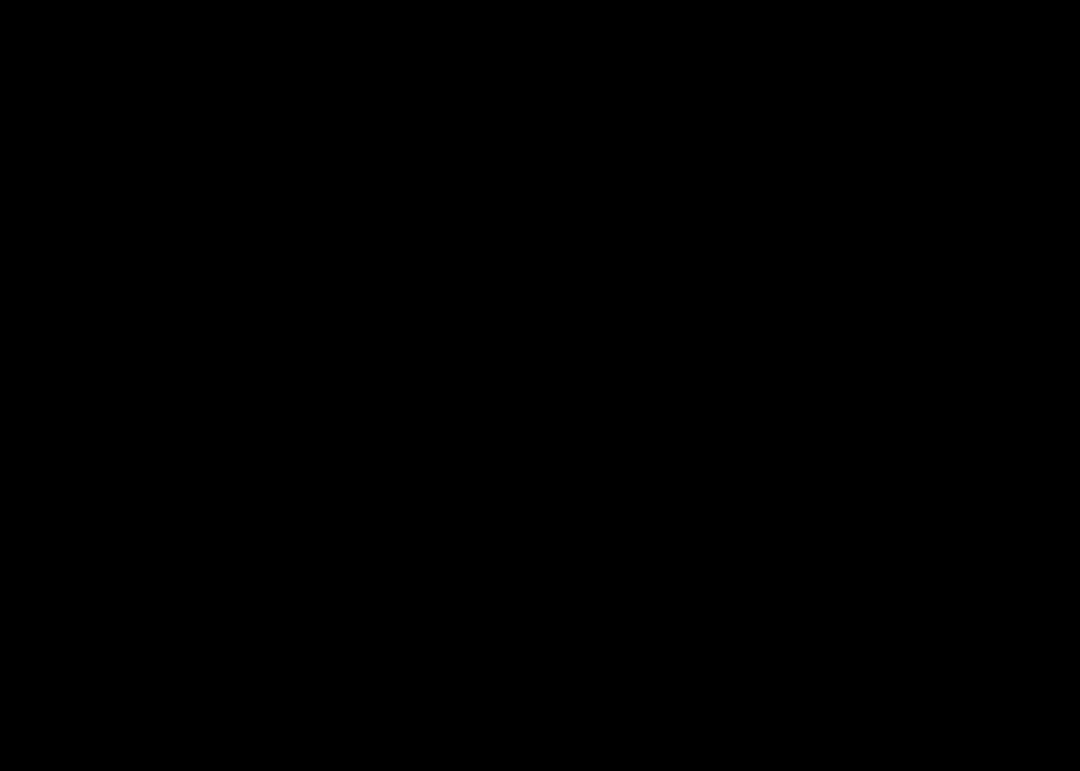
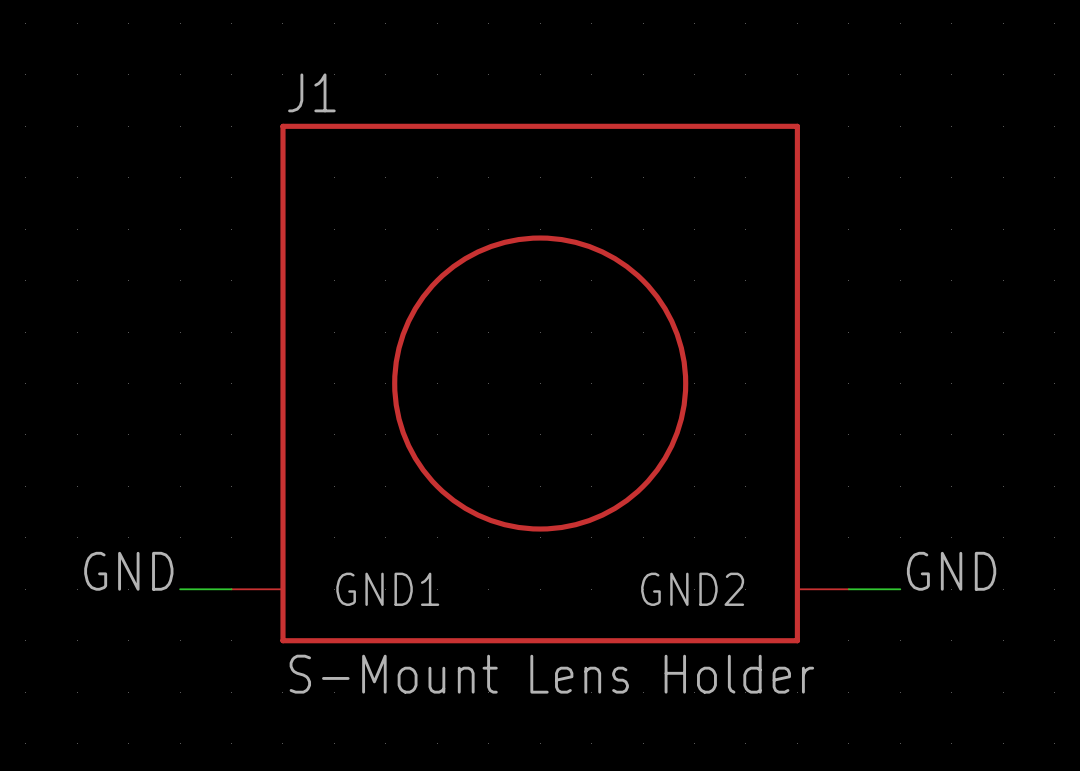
J1: none -> (540, 383)
label: none -> GND (128, 571)
label: none -> GND (951, 571)
wire: none -> (180, 589) (231, 589)
wire: none -> (848, 589) (900, 589)

